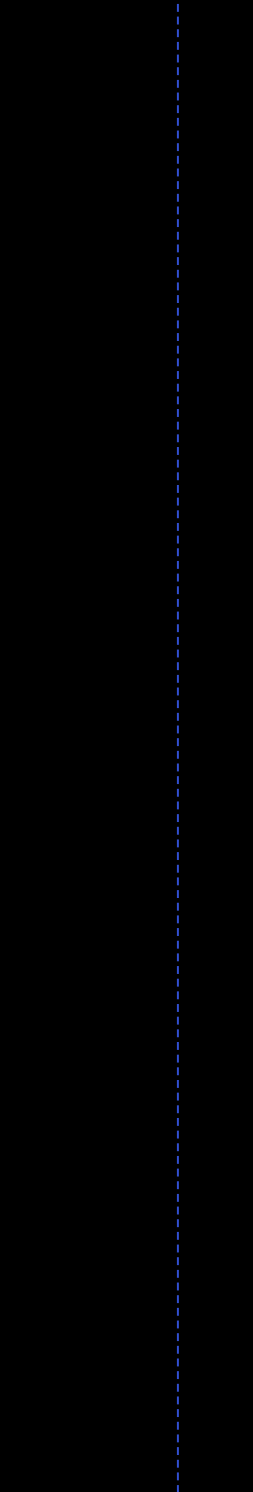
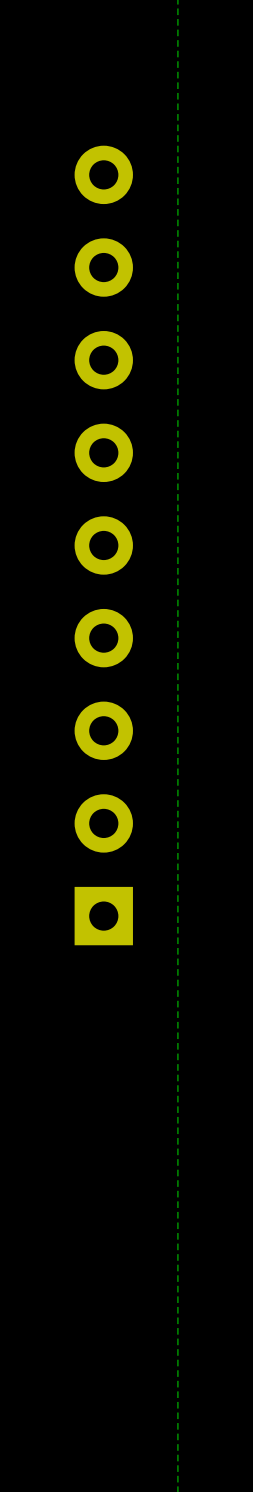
part: none -> (103, 545)

